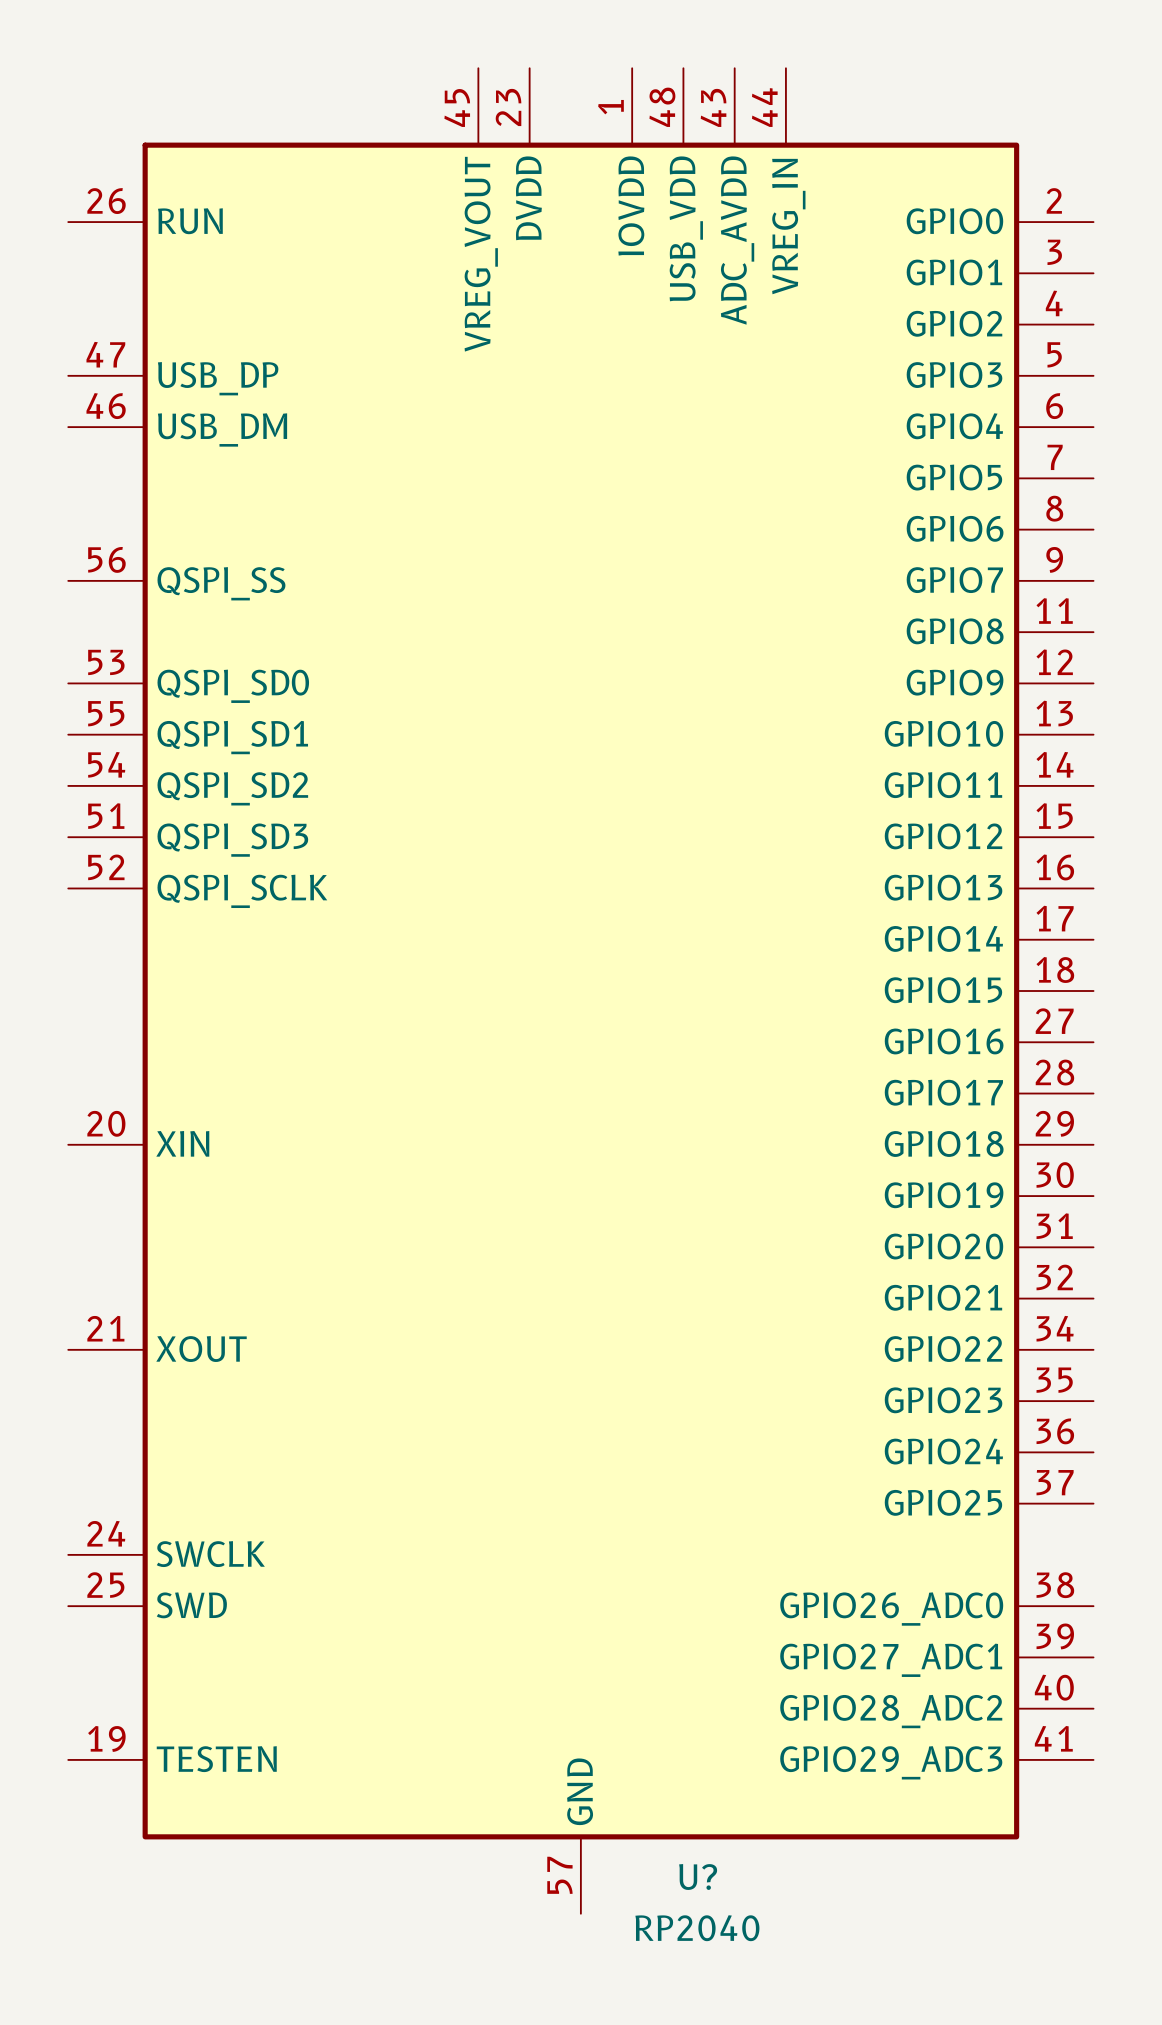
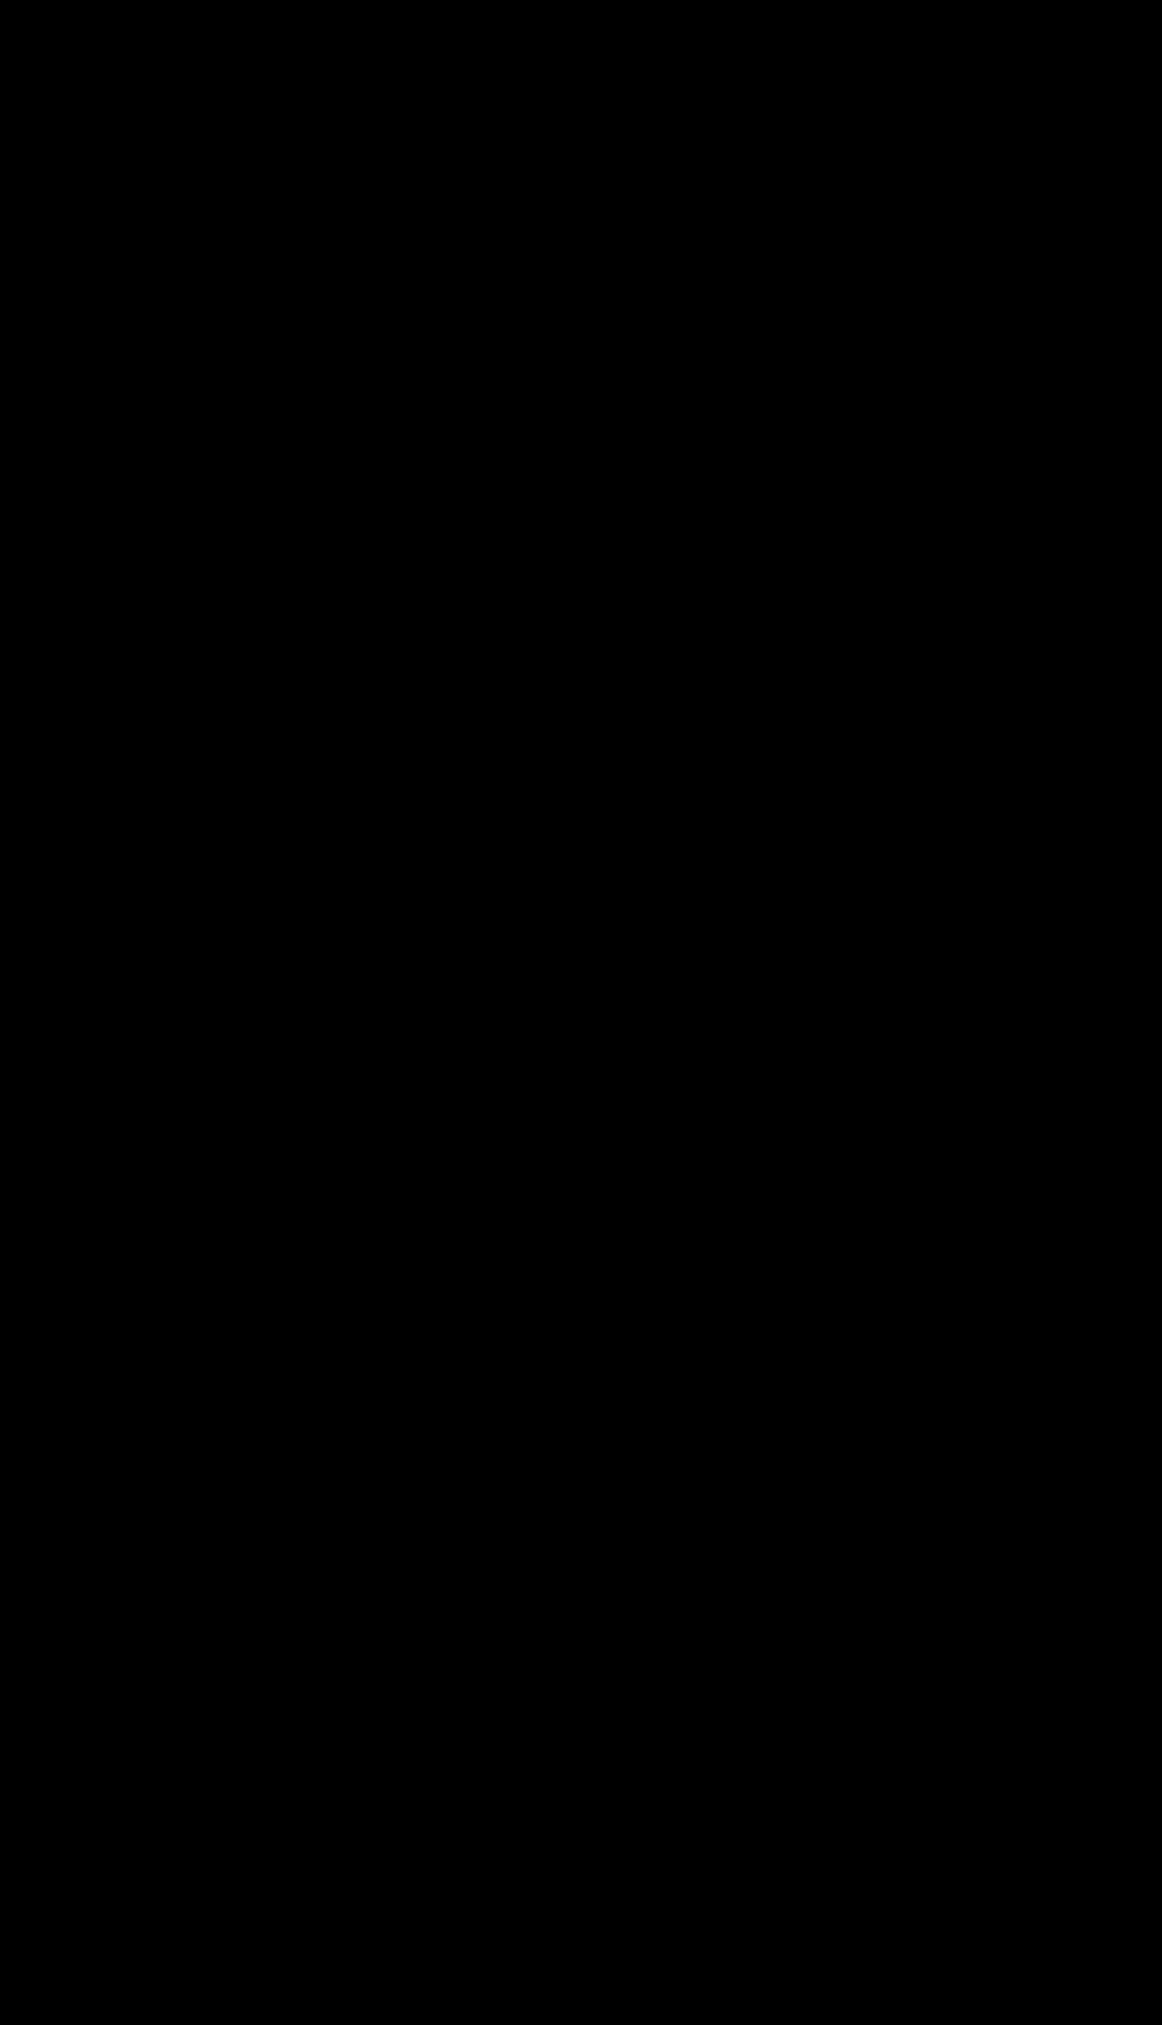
U?: RP2040 (580, 991) -> none

